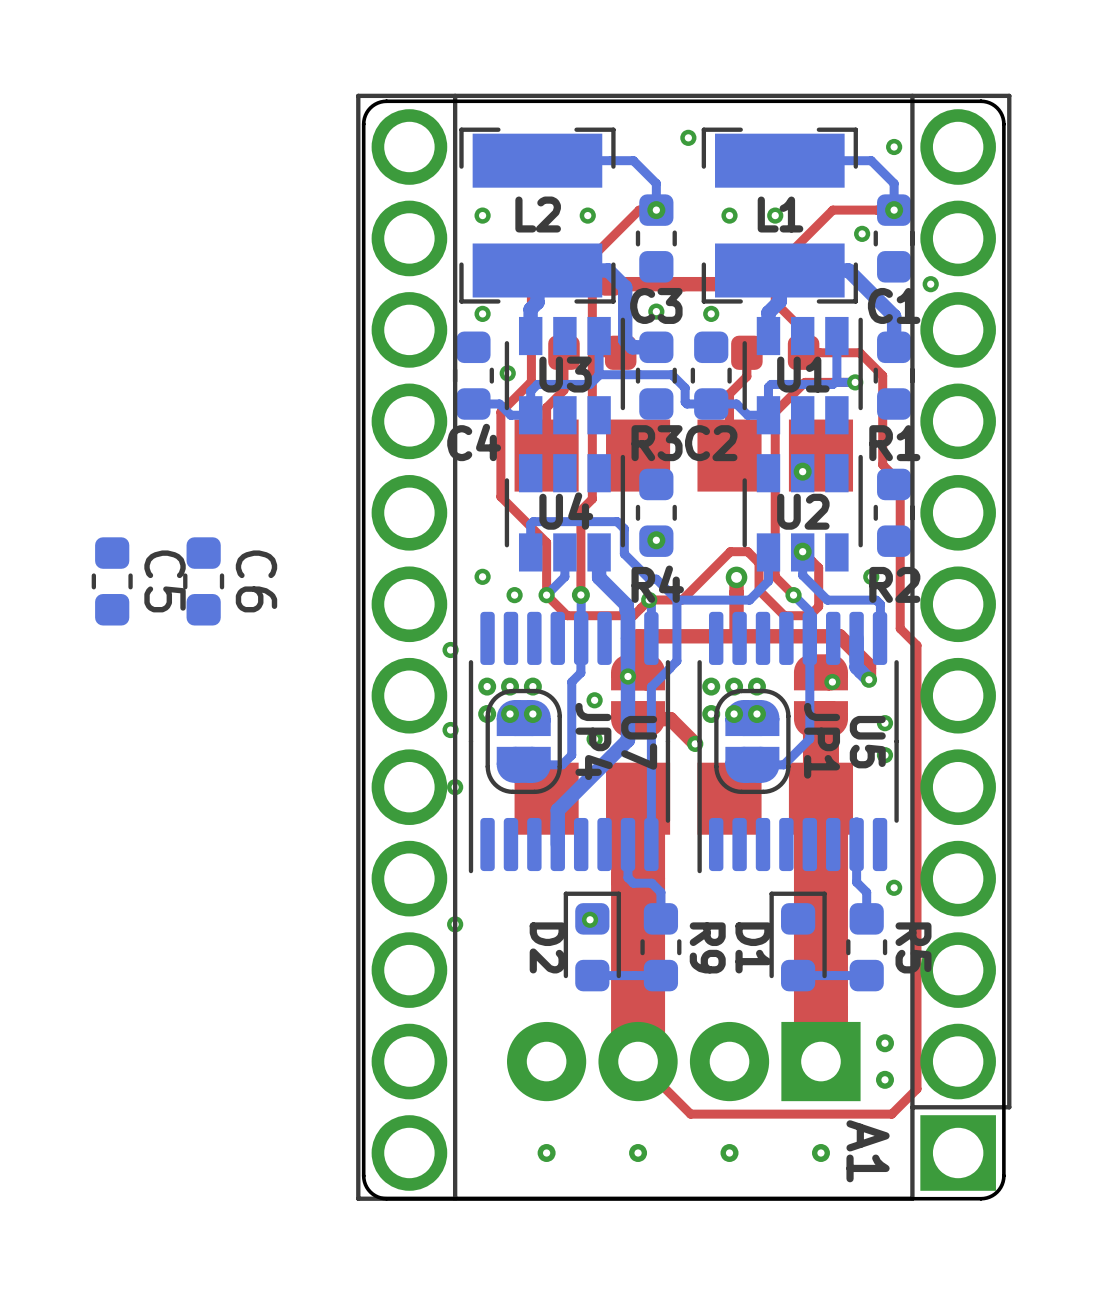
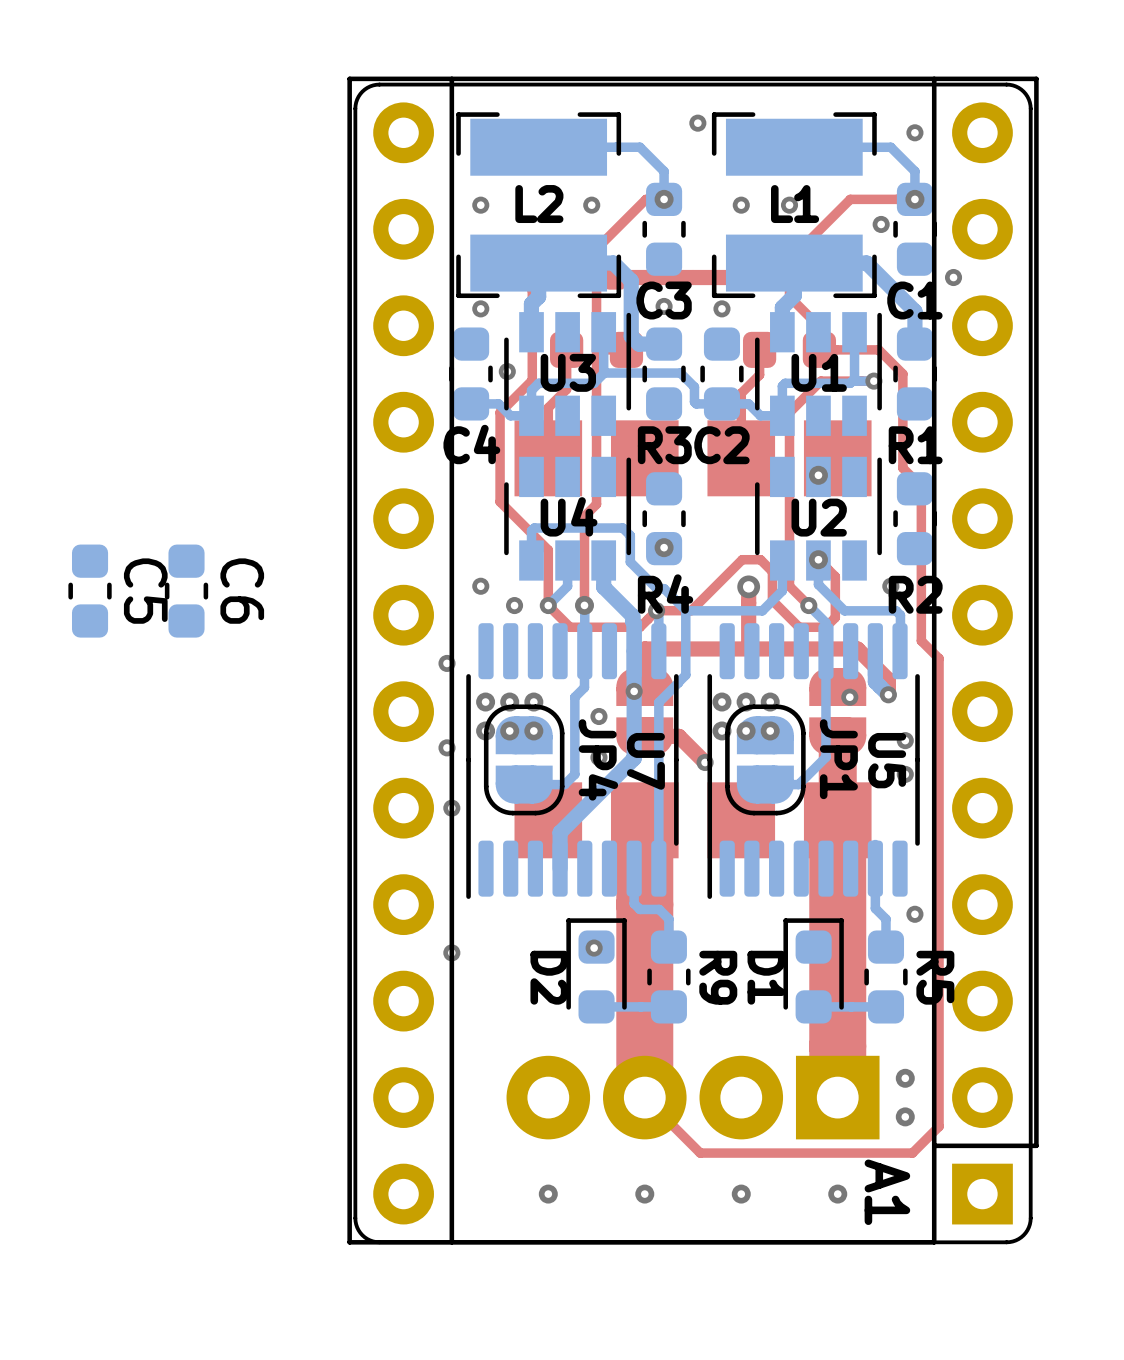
A1 footprint: [356, 93, 1012, 1201] -> [347, 76, 1039, 1245]

